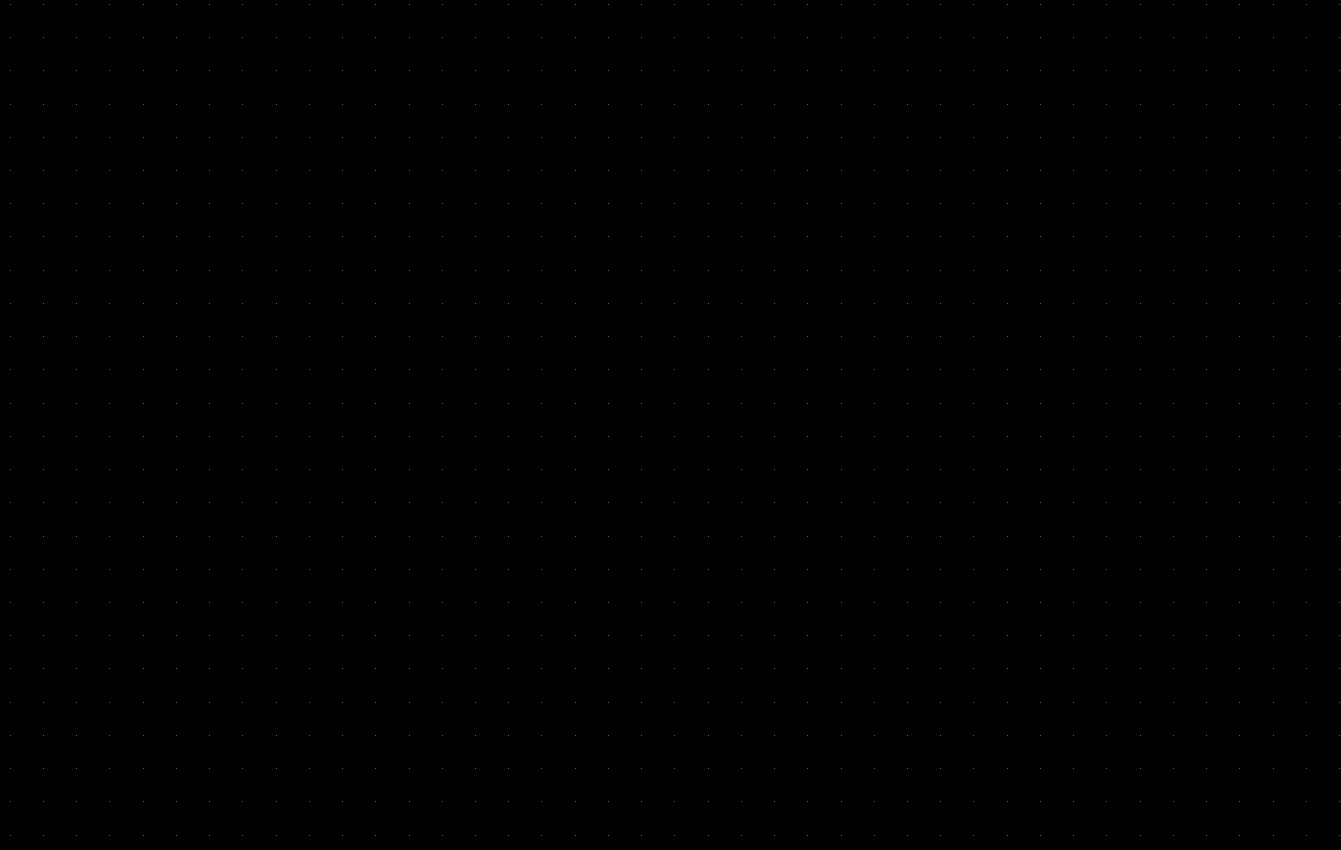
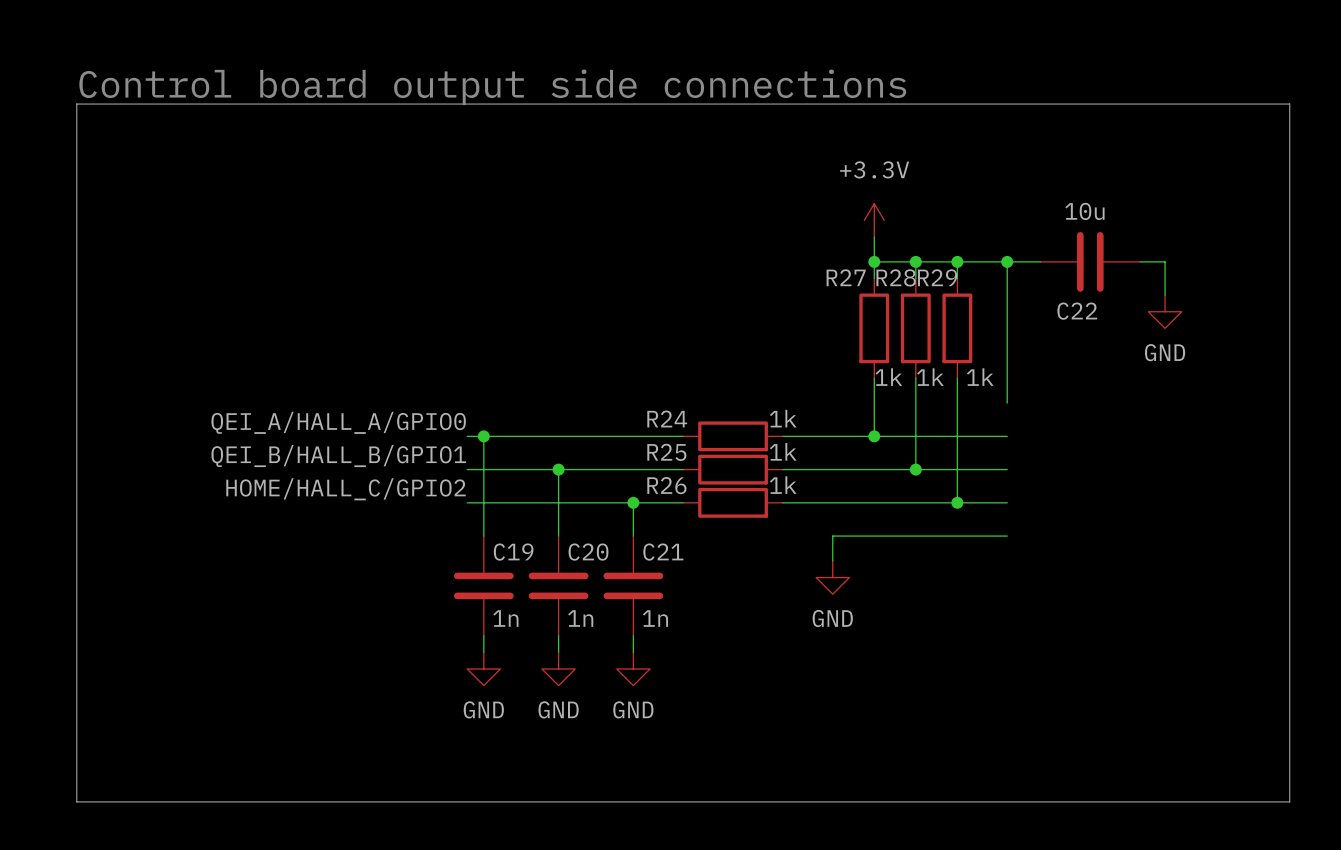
text: none -> Control board output side connections (492, 87)
line: none -> (76, 104) (76, 801) (1289, 801) (1289, 104) (76, 104)
power symbol: none -> +3.3V (874, 220)
wire: none -> (874, 236) (874, 278)
wire: none -> (874, 261) (1040, 261)
junction: none -> (874, 261)
wire: none -> (915, 261) (915, 278)
junction: none -> (915, 261)
wire: none -> (957, 261) (957, 278)
junction: none -> (957, 261)
wire: none -> (1007, 261) (1007, 403)
junction: none -> (1007, 261)
C22: none -> 10u (1090, 261)
wire: none -> (1140, 261) (1165, 261) (1165, 295)
power symbol: none -> GND (1165, 311)
R27: none -> 1k (874, 328)
R28: none -> 1k (915, 328)
R29: none -> 1k (957, 328)
wire: none -> (874, 378) (874, 436)
wire: none -> (915, 378) (915, 469)
wire: none -> (957, 378) (957, 502)
label: none -> QEI_A/HALL_A/GPIO0 (338, 422)
wire: none -> (467, 436) (683, 436)
wire: none -> (483, 436) (483, 536)
junction: none -> (483, 436)
R24: none -> 1k (733, 436)
wire: none -> (782, 436) (1007, 436)
junction: none -> (874, 436)
label: none -> QEI_B/HALL_B/GPIO1 (338, 456)
wire: none -> (467, 469) (683, 469)
wire: none -> (558, 469) (558, 536)
junction: none -> (558, 469)
R25: none -> 1k (733, 469)
wire: none -> (782, 469) (1007, 469)
junction: none -> (915, 469)
label: none -> HOME/HALL_C/GPIO2 (346, 489)
wire: none -> (467, 502) (683, 502)
wire: none -> (633, 502) (633, 536)
junction: none -> (633, 502)
R26: none -> 1k (733, 502)
wire: none -> (782, 502) (1007, 502)
junction: none -> (957, 502)
wire: none -> (1007, 536) (832, 536) (832, 560)
power symbol: none -> GND (832, 577)
C19: none -> 1n (483, 585)
C20: none -> 1n (558, 585)
C21: none -> 1n (633, 585)
wire: none -> (483, 635) (483, 652)
wire: none -> (558, 635) (558, 652)
wire: none -> (633, 635) (633, 652)
power symbol: none -> GND (483, 668)
power symbol: none -> GND (558, 668)
power symbol: none -> GND (633, 668)

